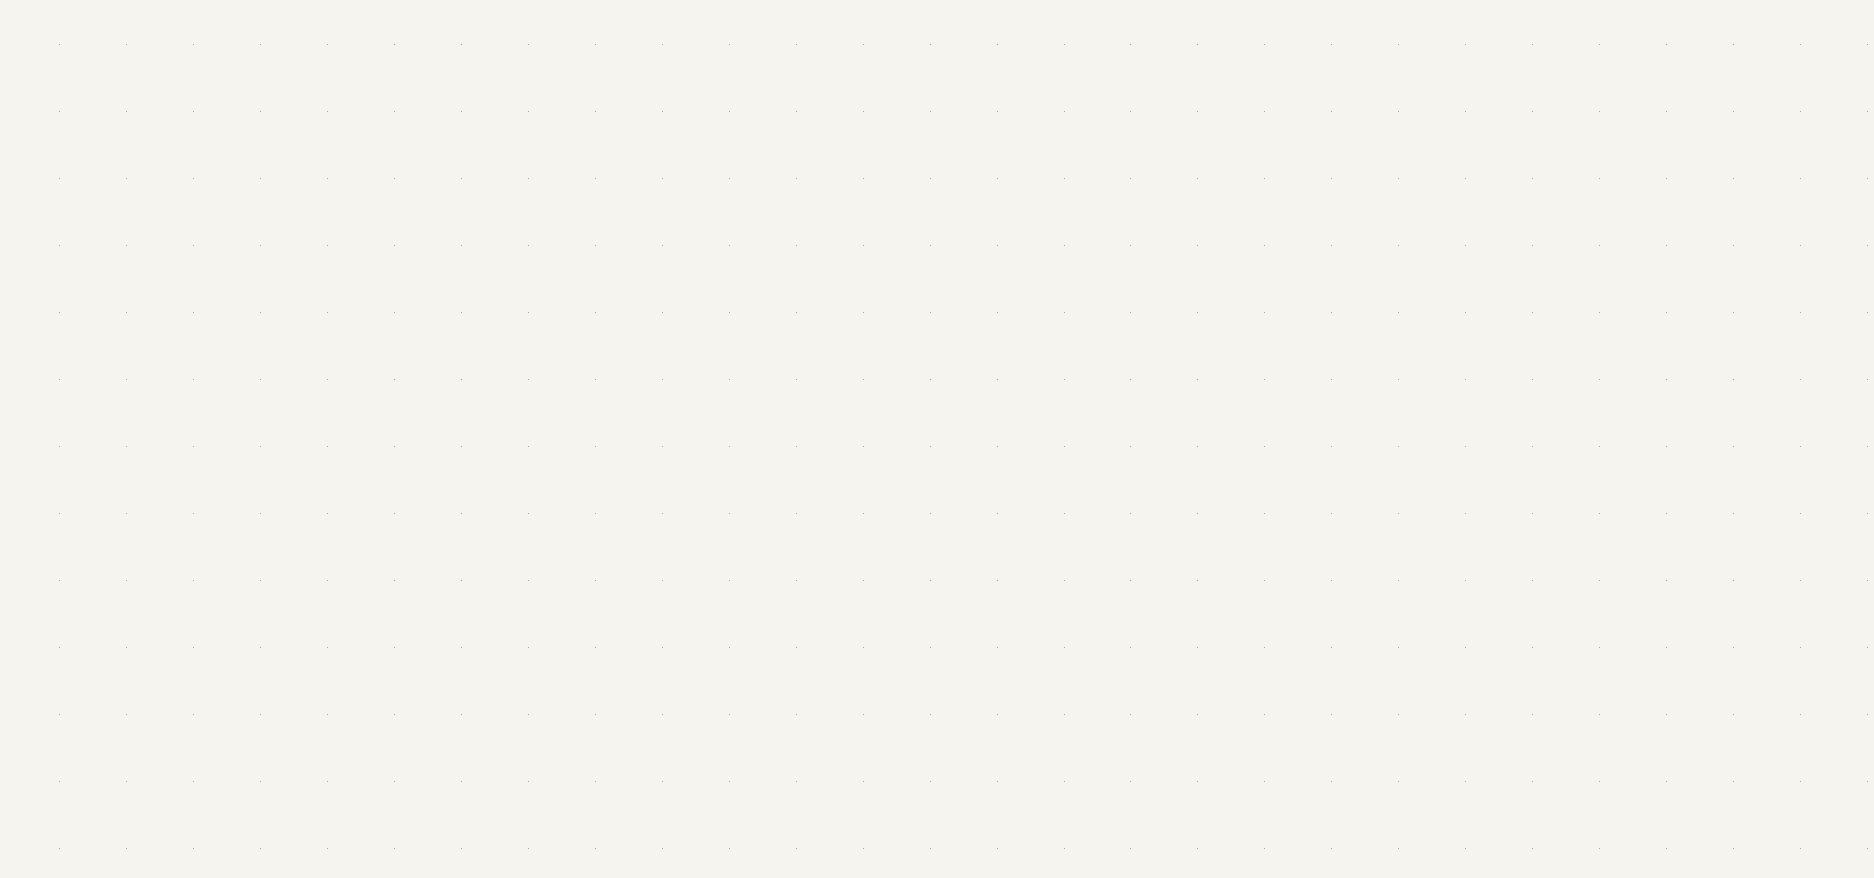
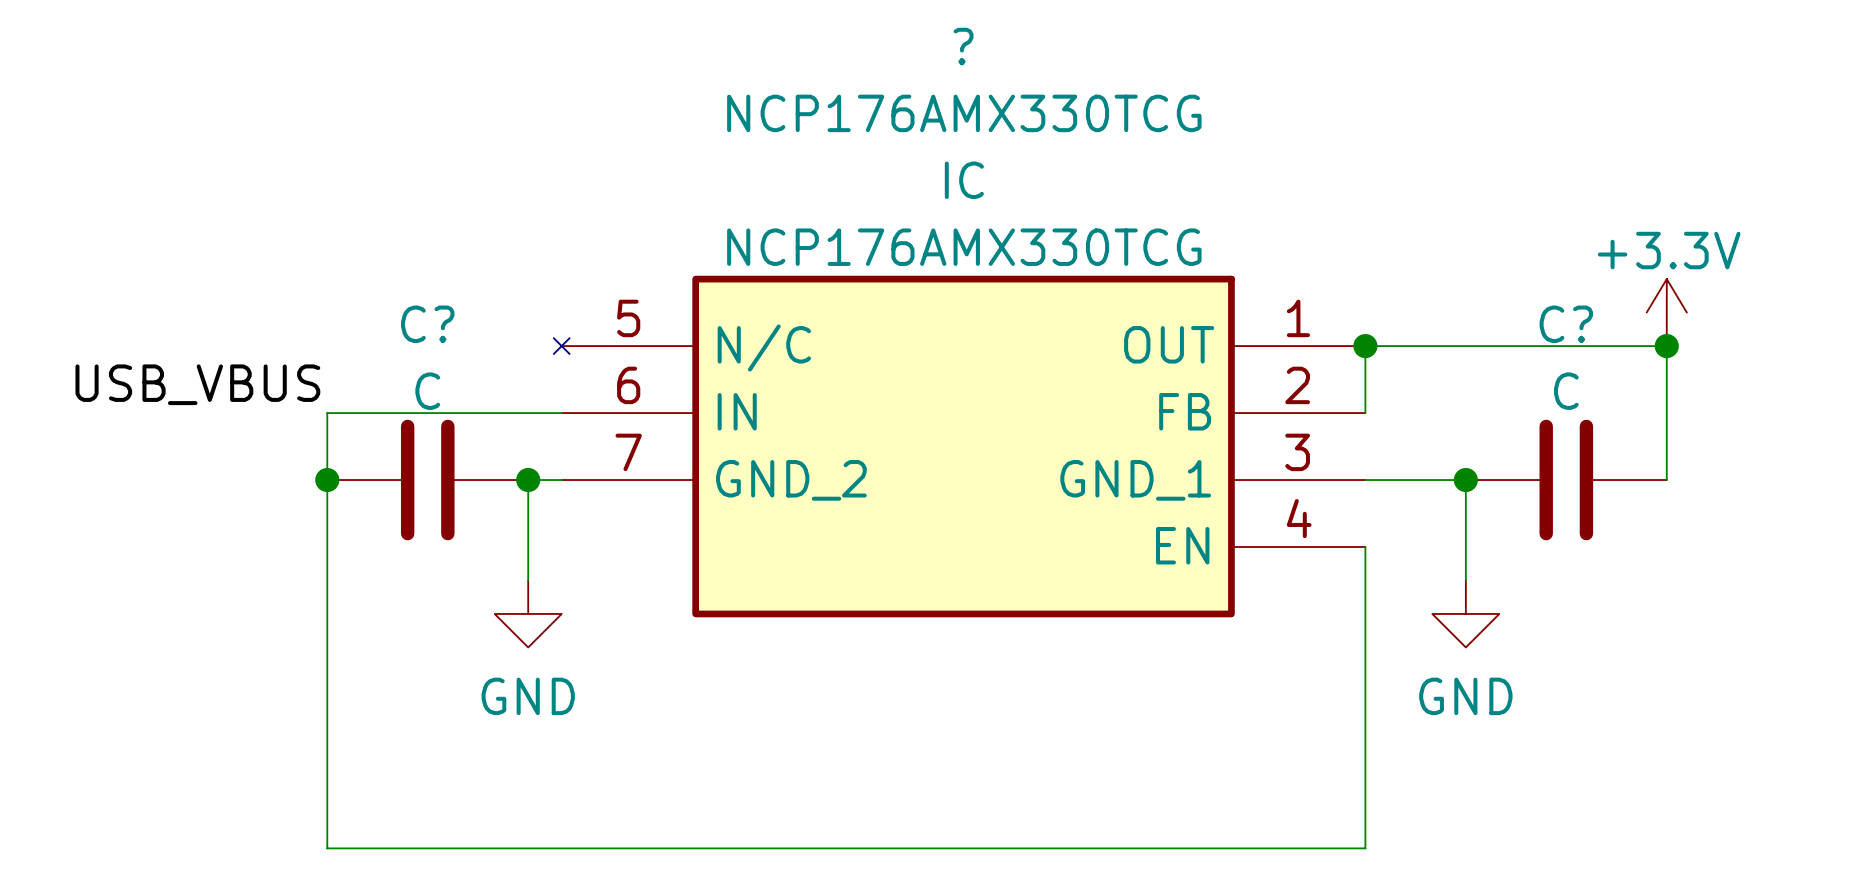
power symbol: none -> +3.3V (1666, 312)
junction: none -> (1365, 346)
junction: none -> (1666, 346)
label: none -> USB_VBUS (197, 384)
wire: none -> (561, 413) (327, 413) (327, 848) (1365, 848) (1365, 546)
wire: none -> (1365, 413) (1365, 346) (1666, 346) (1666, 480)
part: none -> NCP176AMX330TCG (959, 446)
junction: none -> (327, 480)
C?: none -> C (427, 480)
junction: none -> (528, 480)
wire: none -> (561, 480) (528, 480) (528, 580)
wire: none -> (1365, 480) (1465, 480) (1465, 580)
junction: none -> (1465, 480)
C?: none -> C (1566, 480)
power symbol: none -> GND (528, 613)
power symbol: none -> GND (1465, 613)

